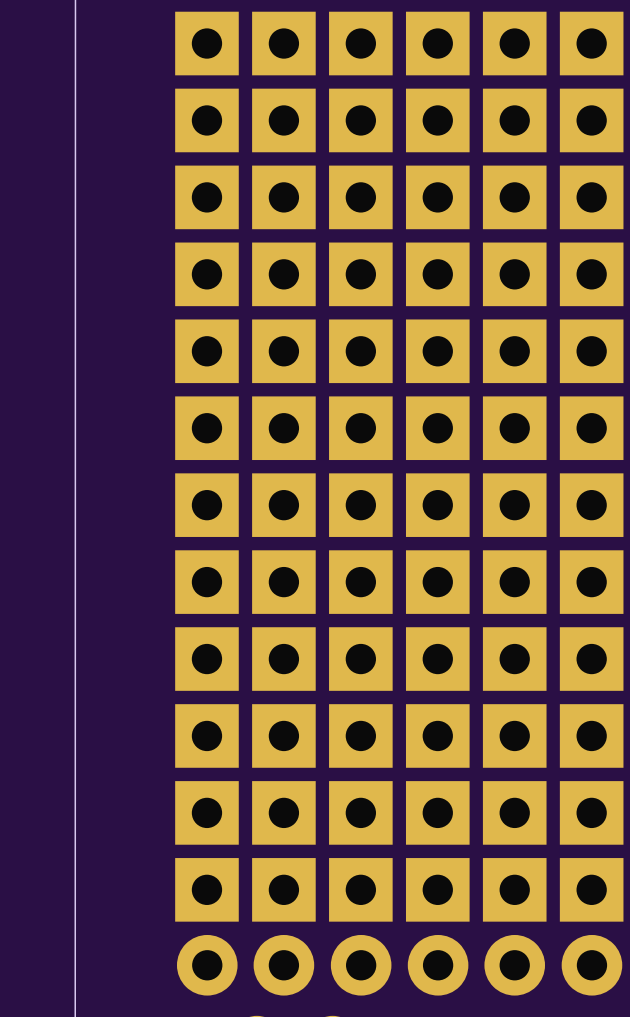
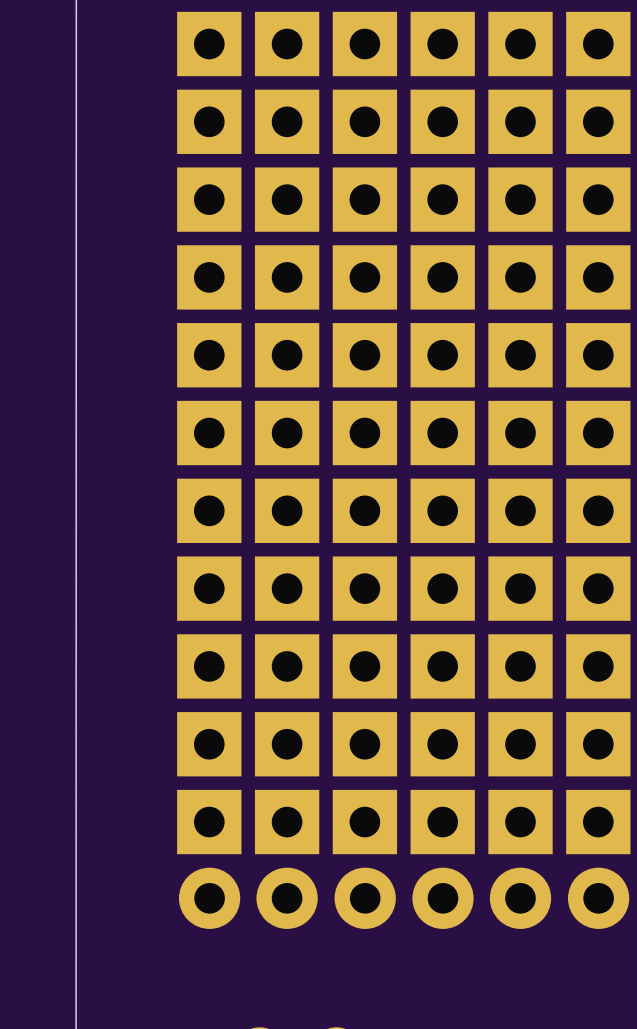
part footprint: [175, 858, 239, 922] -> [178, 867, 241, 929]
part footprint: [252, 858, 316, 922] -> [256, 867, 318, 929]
part footprint: [329, 858, 393, 922] -> [334, 867, 396, 929]
part footprint: [405, 858, 470, 922] -> [412, 867, 474, 929]
part footprint: [482, 858, 547, 922] -> [489, 867, 552, 929]
part footprint: [559, 858, 624, 922] -> [567, 867, 630, 929]
part: (207, 965) -> none
part: (283, 965) -> none
part: (361, 965) -> none
part: (438, 965) -> none
part: (514, 965) -> none
part: (591, 965) -> none

